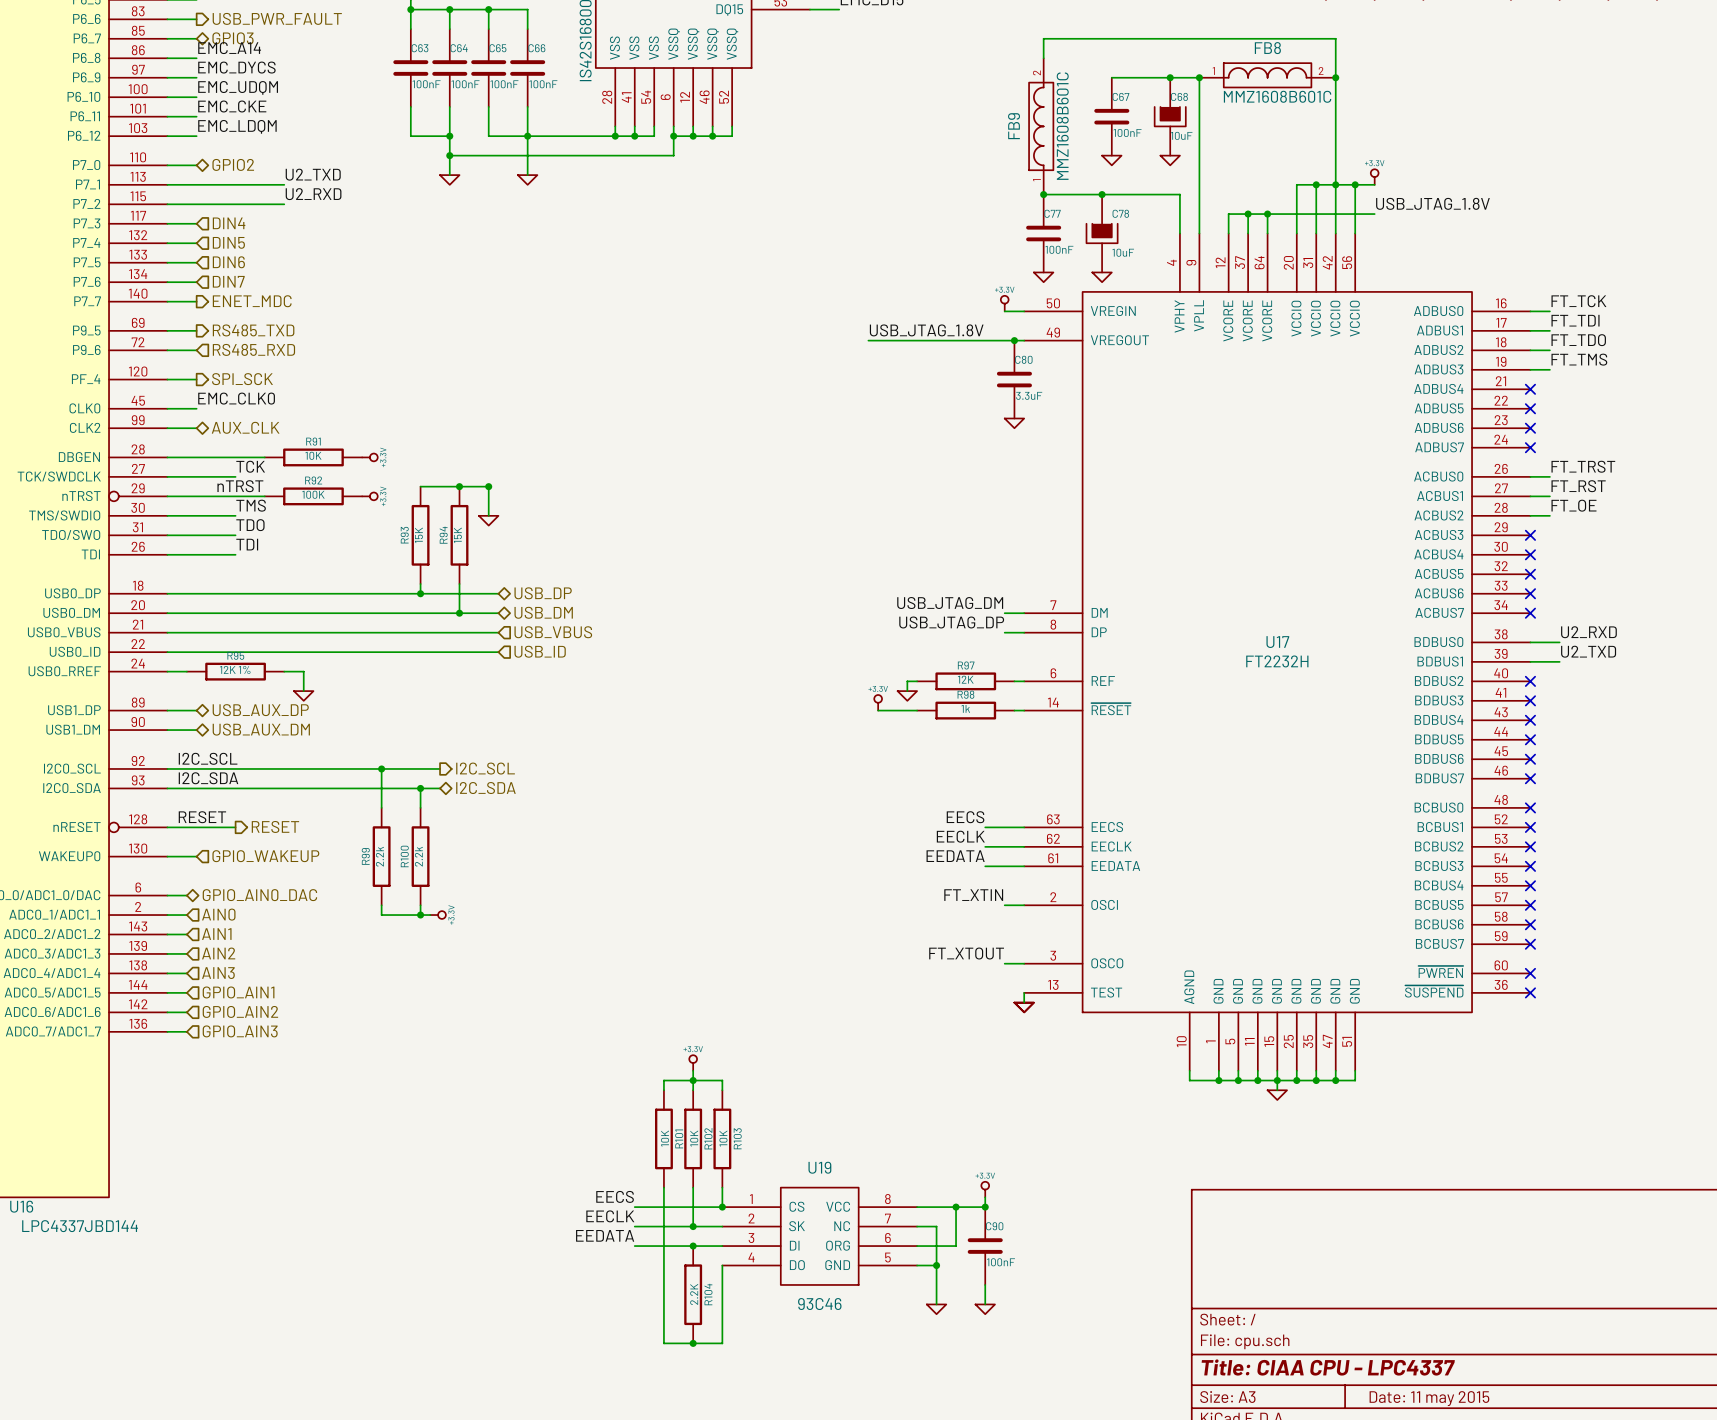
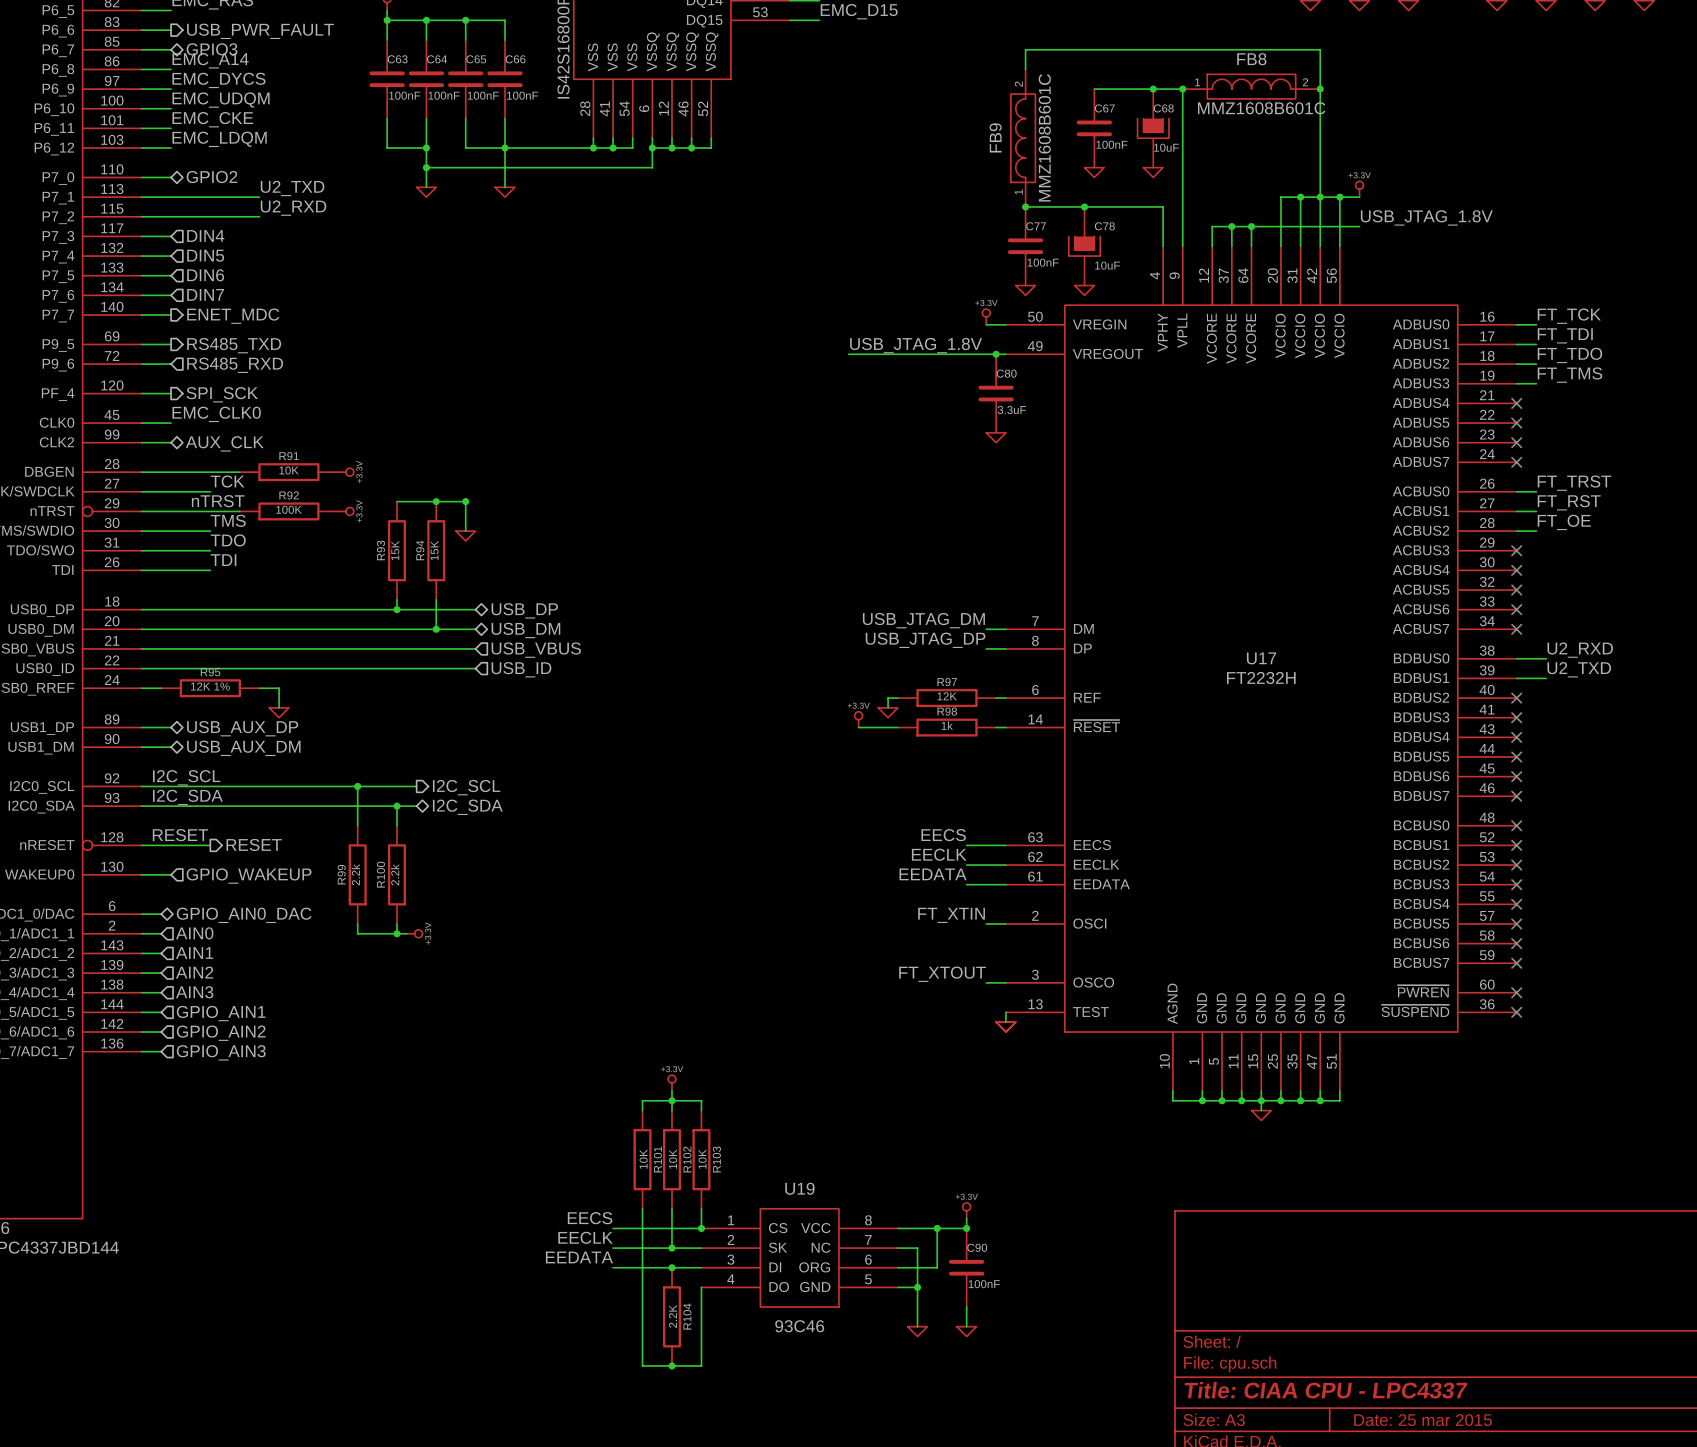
title block: Date: 11 may 2015 (1429, 1398) -> Date: 25 mar 2015 (1423, 1420)

